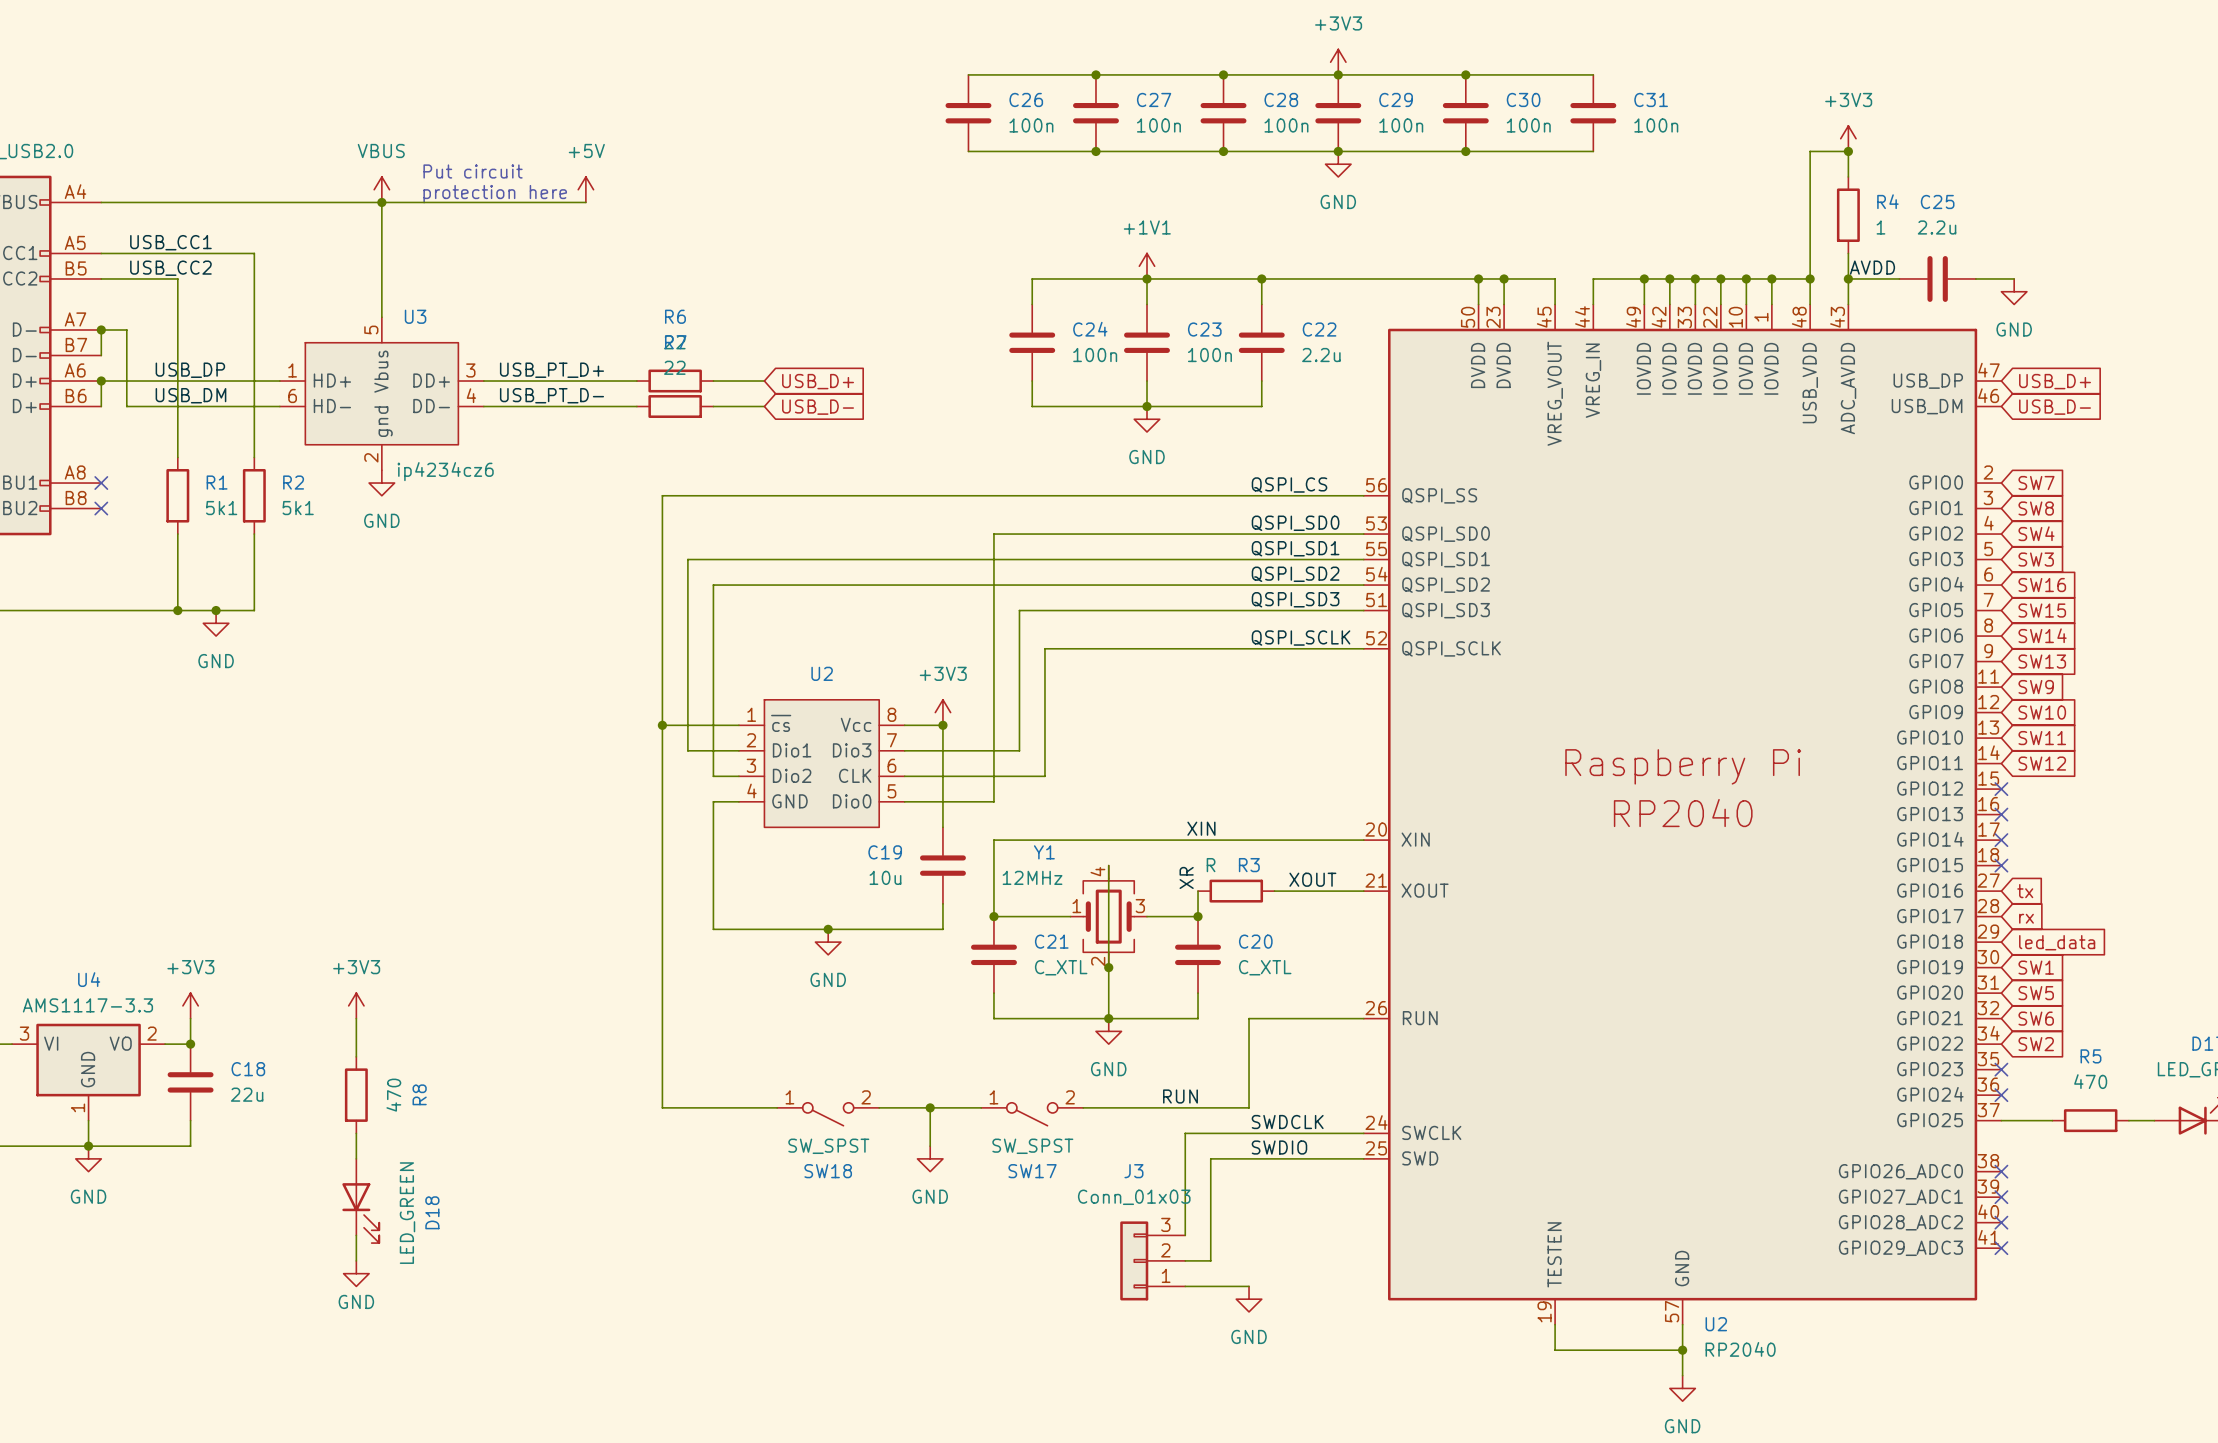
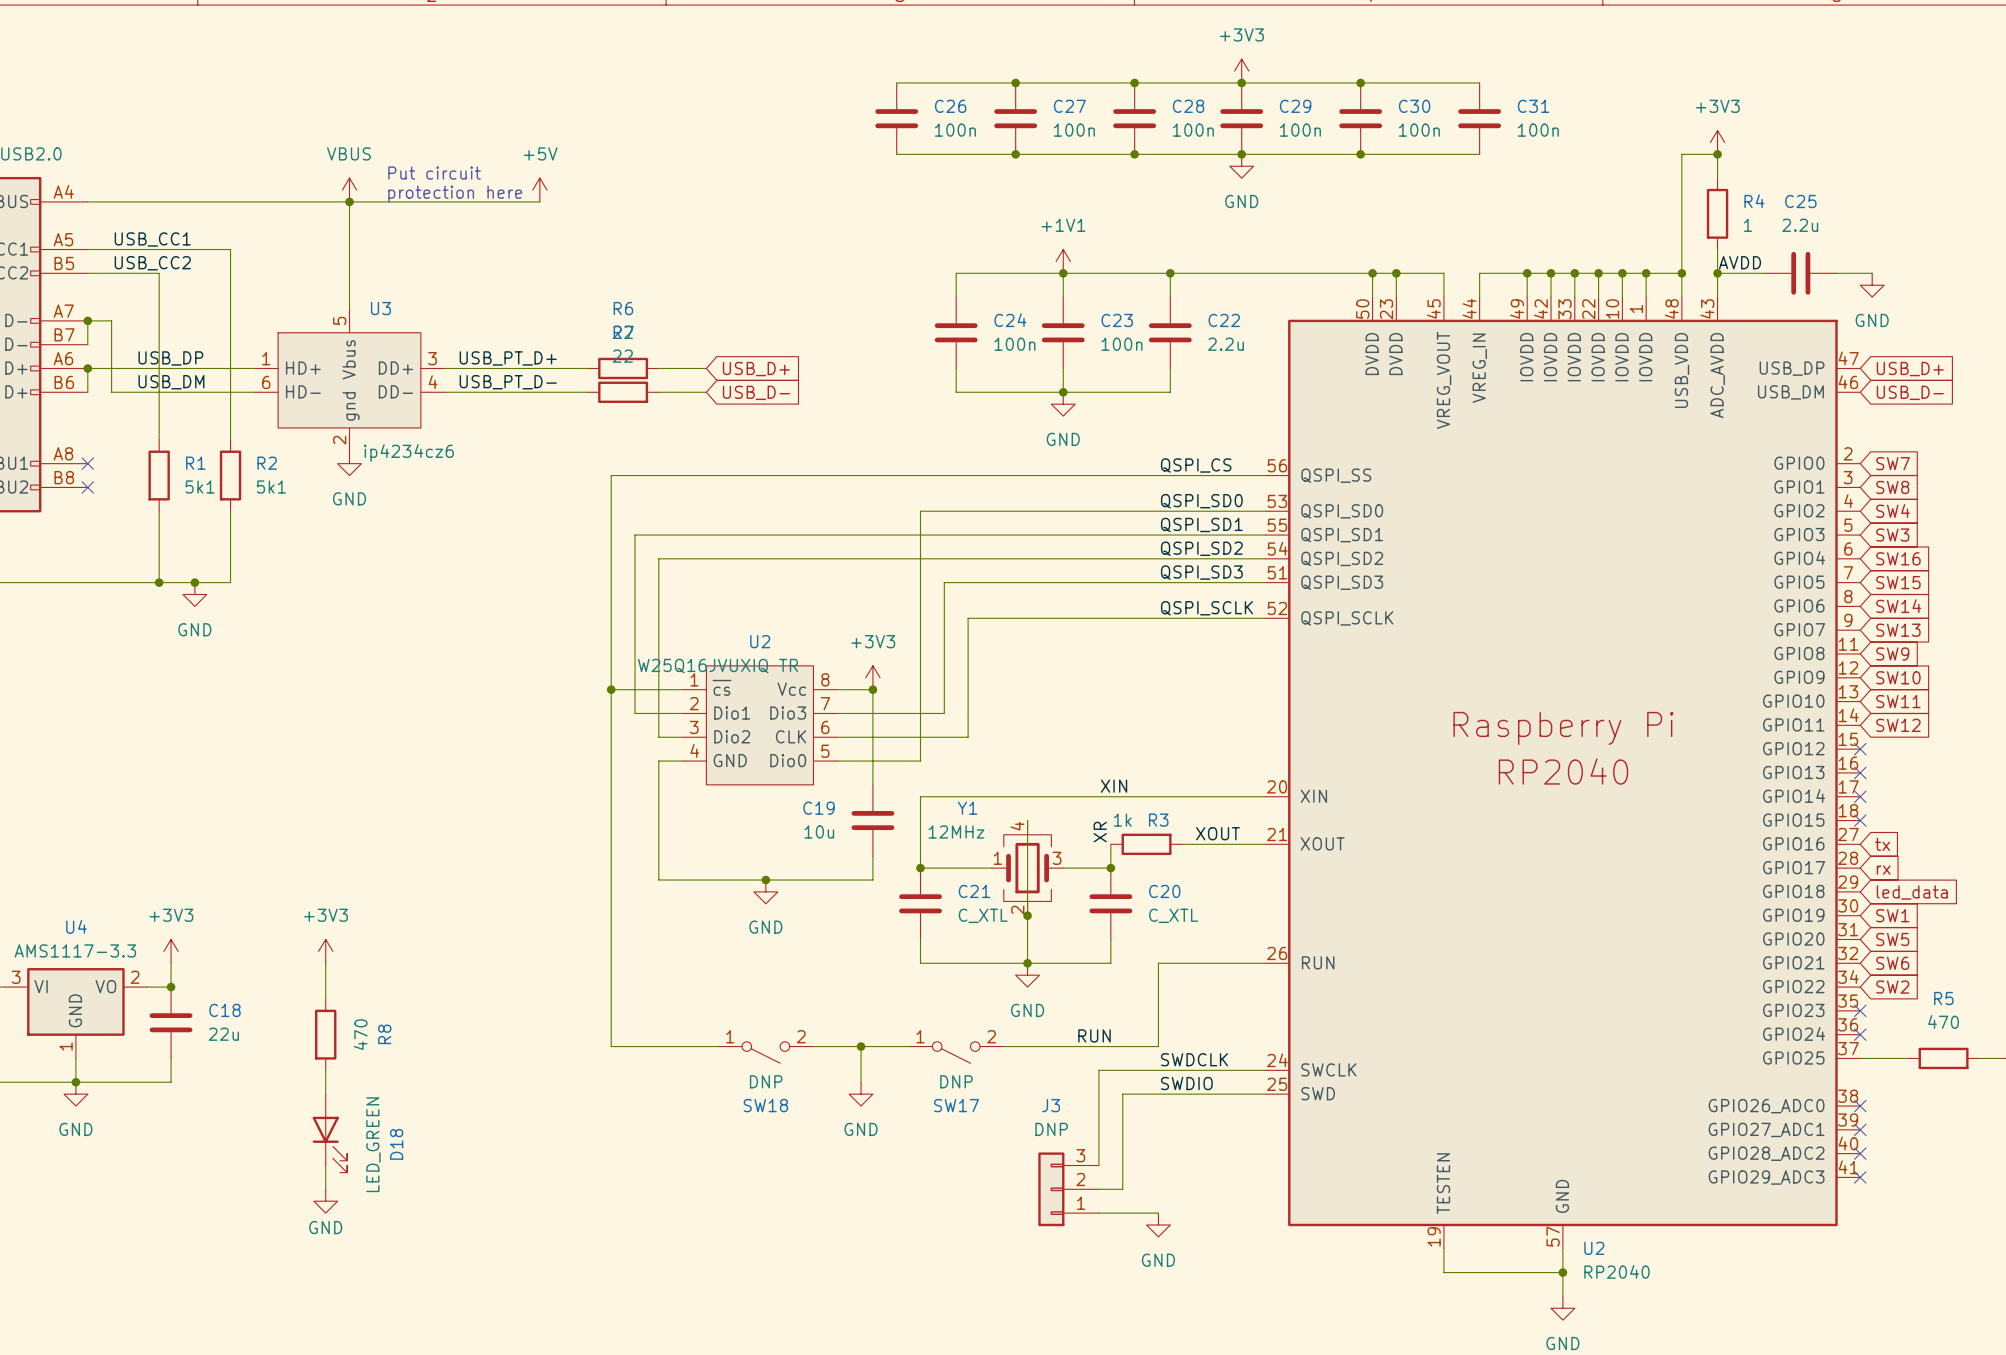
U2 value: none -> W25Q16JVUXIQ TR (717, 666)
R3 value: R (1211, 865) -> 1k (1122, 820)
SW18 value: SW_SPST (828, 1146) -> DNP (766, 1081)
SW17 value: SW_SPST (1032, 1146) -> DNP (956, 1081)
J3 value: Conn_01x03 (1134, 1197) -> DNP (1051, 1129)

